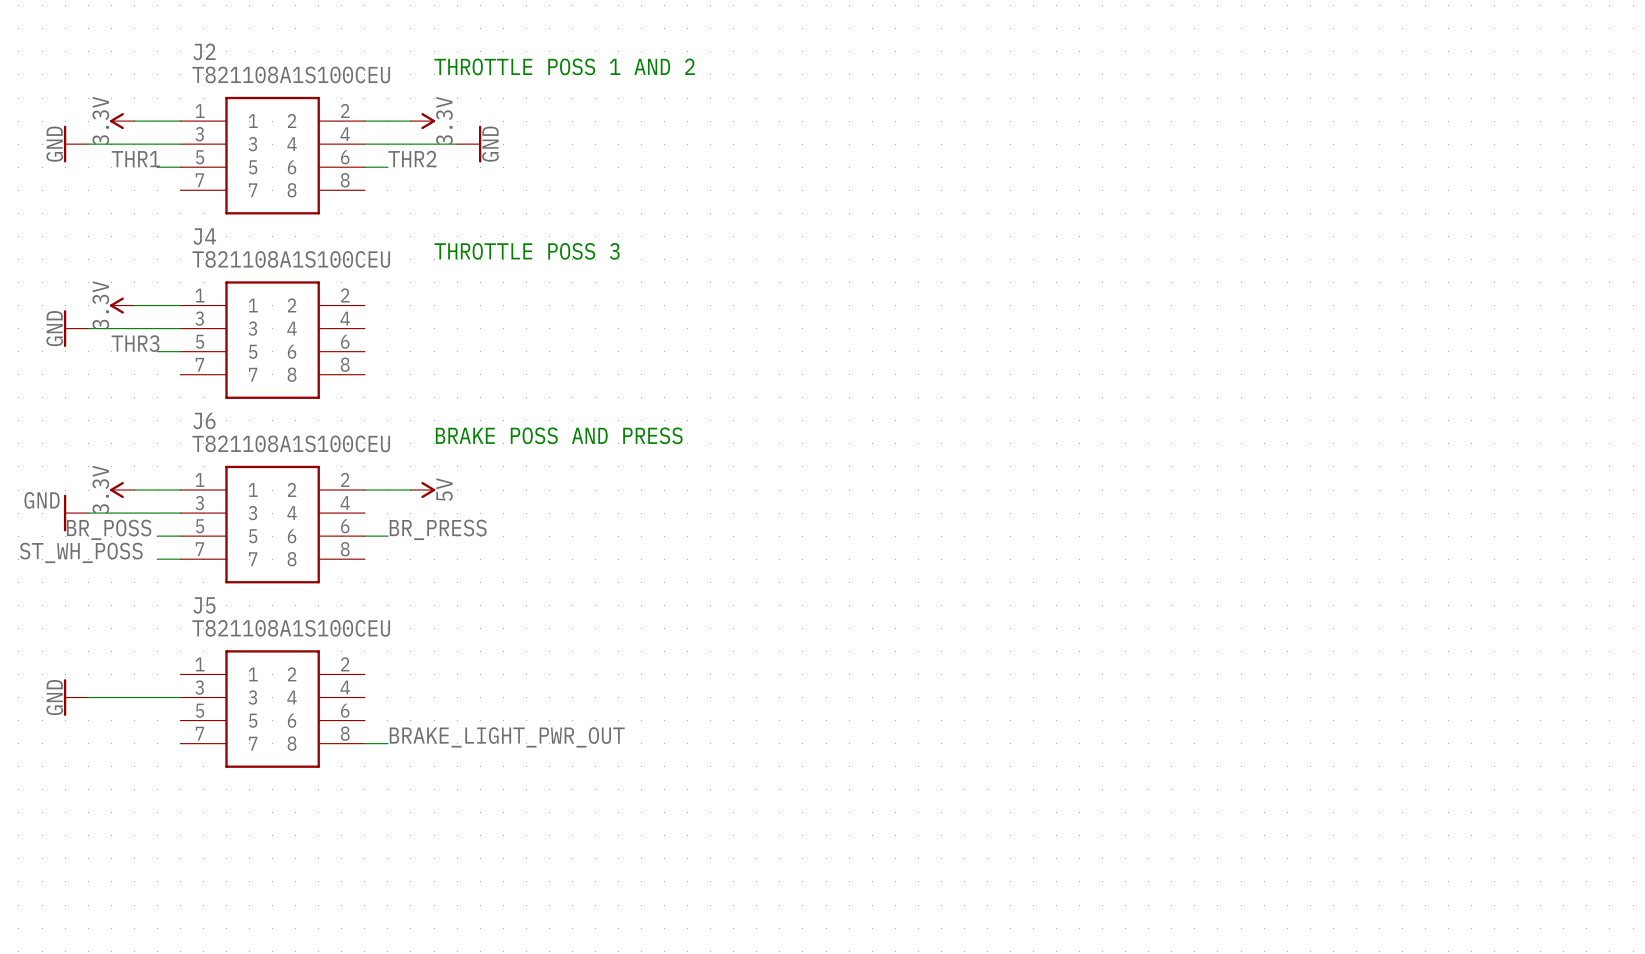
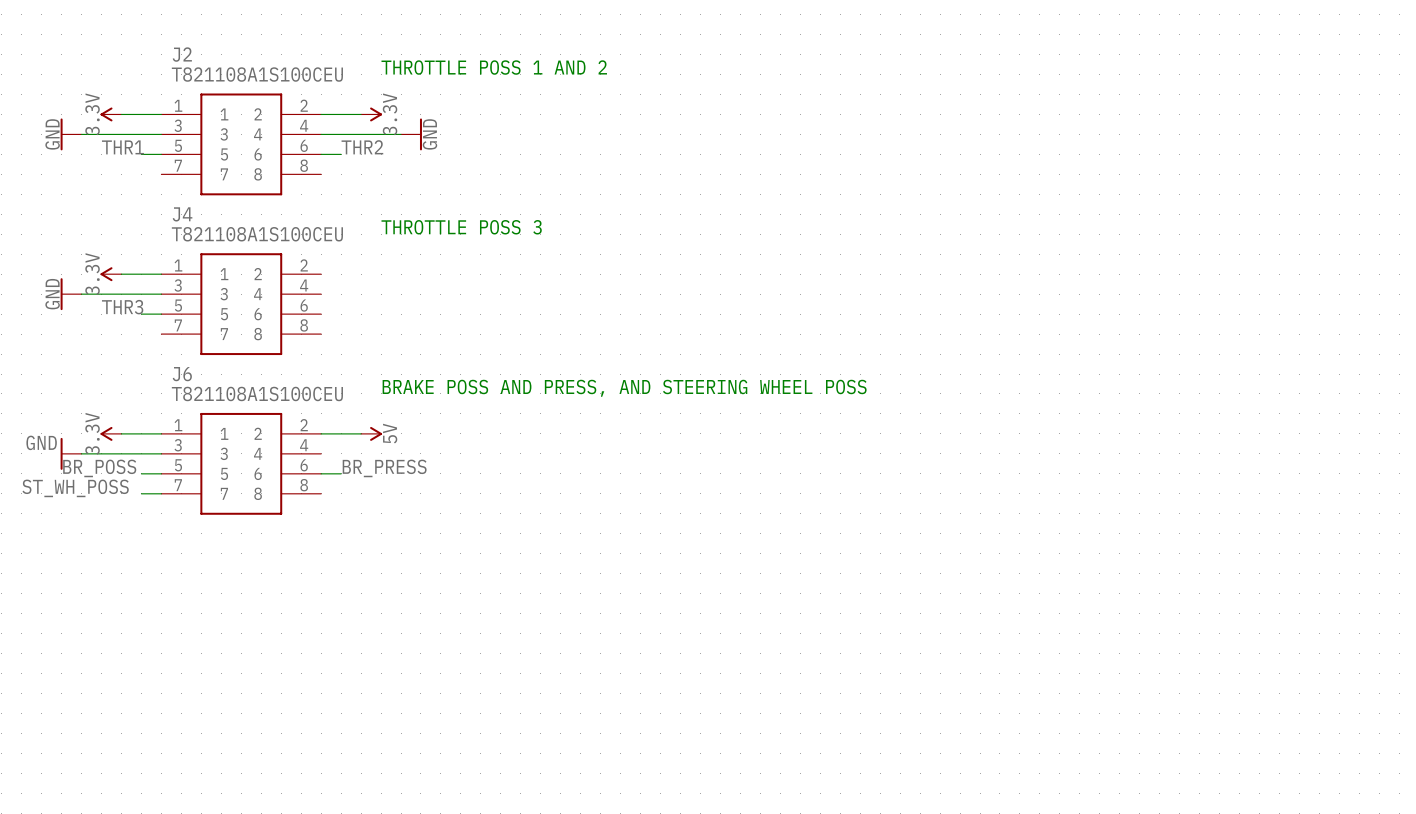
text: BRAKE POSS AND PRESS (559, 435) -> BRAKE POSS AND PRESS, AND STEERING WHEEL POSS (624, 388)
power symbol: GND (76, 697) -> none
wire: (88, 697) (180, 697) -> none
J5: T821108A1S100CEU (272, 709) -> none
label: BRAKE_LIGHT_PWR_OUT (507, 737) -> none
wire: (364, 743) (387, 743) -> none

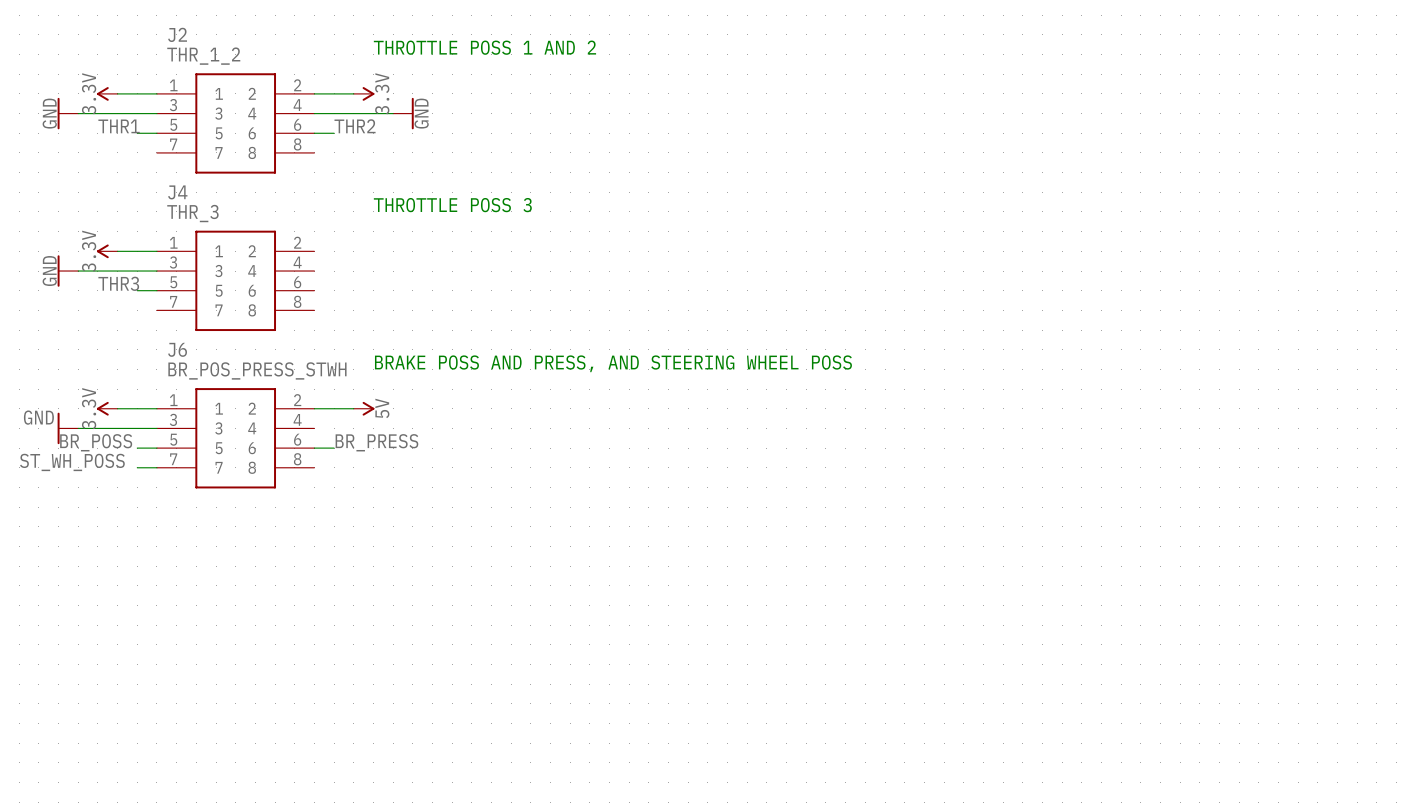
J2 value: T821108A1S100CEU (257, 74) -> THR_1_2 (203, 56)
J4 value: T821108A1S100CEU (257, 234) -> THR_3 (192, 213)
J6 value: T821108A1S100CEU (257, 393) -> BR_POS_PRESS_STWH (257, 370)

